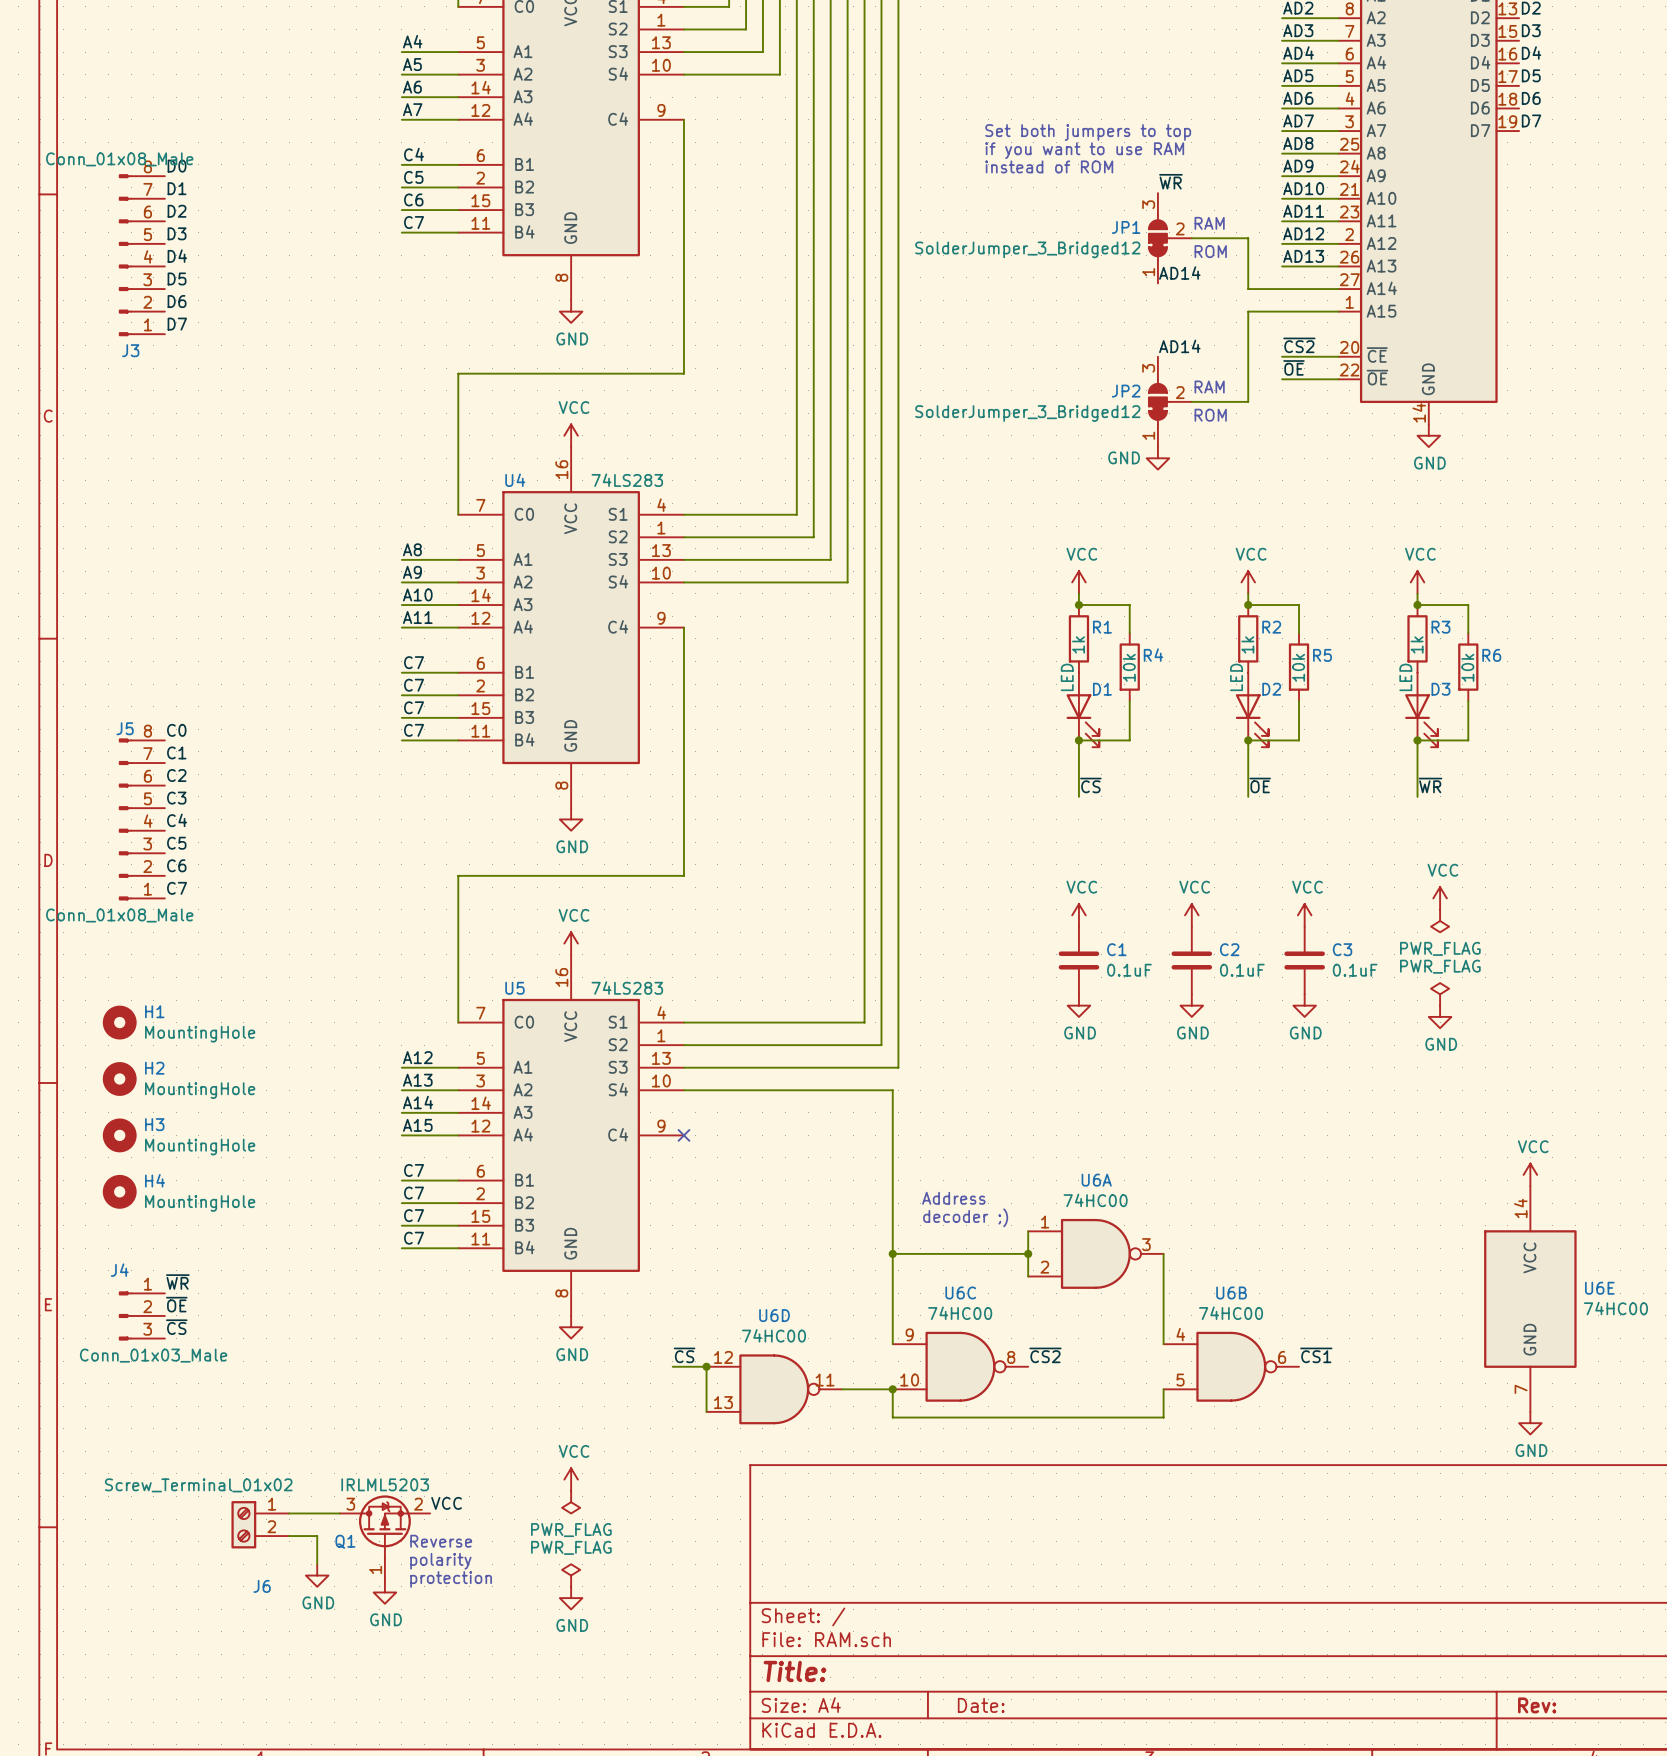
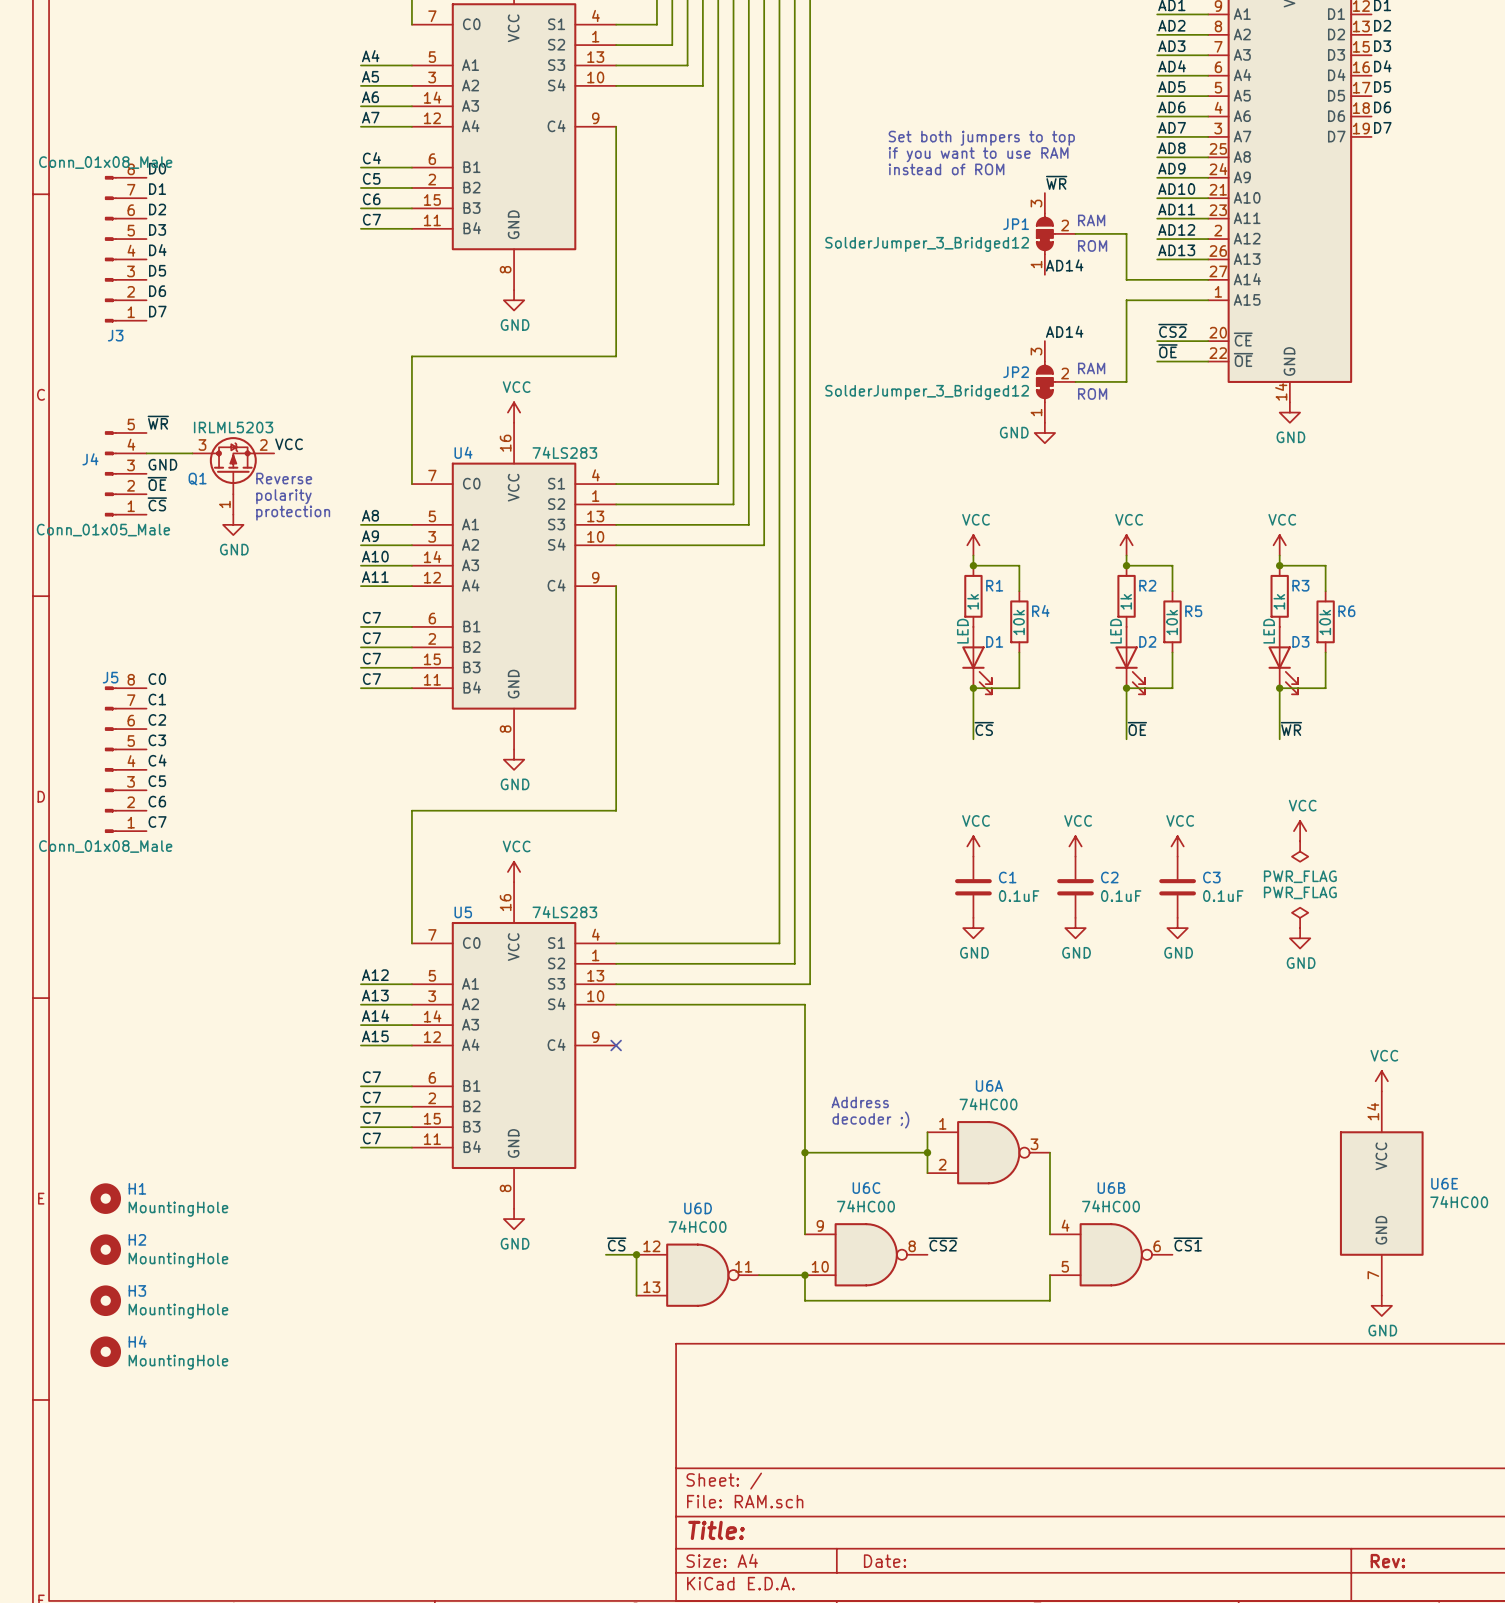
label: none -> ~{WR} (158, 422)
label: none -> VCC (289, 444)
wire: none -> (146, 453) (192, 453)
label: none -> GND (162, 464)
text: none -> Reverse (284, 478)
label: none -> ~{OE} (157, 483)
text: none -> polarity (283, 496)
label: none -> ~{CS} (157, 504)
text: none -> protection (293, 513)
power symbol: none -> GND (233, 524)
H1 position: (119, 1022) -> (105, 1198)
H2 position: (119, 1078) -> (105, 1249)
H3 position: (119, 1135) -> (105, 1300)
H4 position: (119, 1191) -> (105, 1351)
J4 name position: J4 (119, 1270) -> J4 (90, 459)
label: ~{WR} (177, 1282) -> none
J4 symbol: [119, 1291, 165, 1341] -> [105, 431, 147, 517]
label: ~{OE} (176, 1304) -> none
label: ~{CS} (176, 1327) -> none
J4 value: Conn_01x03_Male (153, 1355) -> Conn_01x05_Male (103, 530)
power symbol: VCC (571, 1479) -> none
power symbol: PWR_FLAG (571, 1502) -> none
label: VCC (446, 1503) -> none
wire: (289, 1513) (339, 1513) -> none
J6: Screw_Terminal_01x02 (260, 1524) -> none
wire: (289, 1536) (317, 1536) (317, 1564) -> none
Q1 position: (384, 1538) -> (233, 475)
text: Reverse (441, 1541) -> none
text: polarity (440, 1561) -> none
power symbol: GND (317, 1575) -> none
power symbol: PWR_FLAG (571, 1575) -> none
text: protection (451, 1579) -> none
power symbol: GND (384, 1592) -> none
power symbol: GND (571, 1598) -> none

